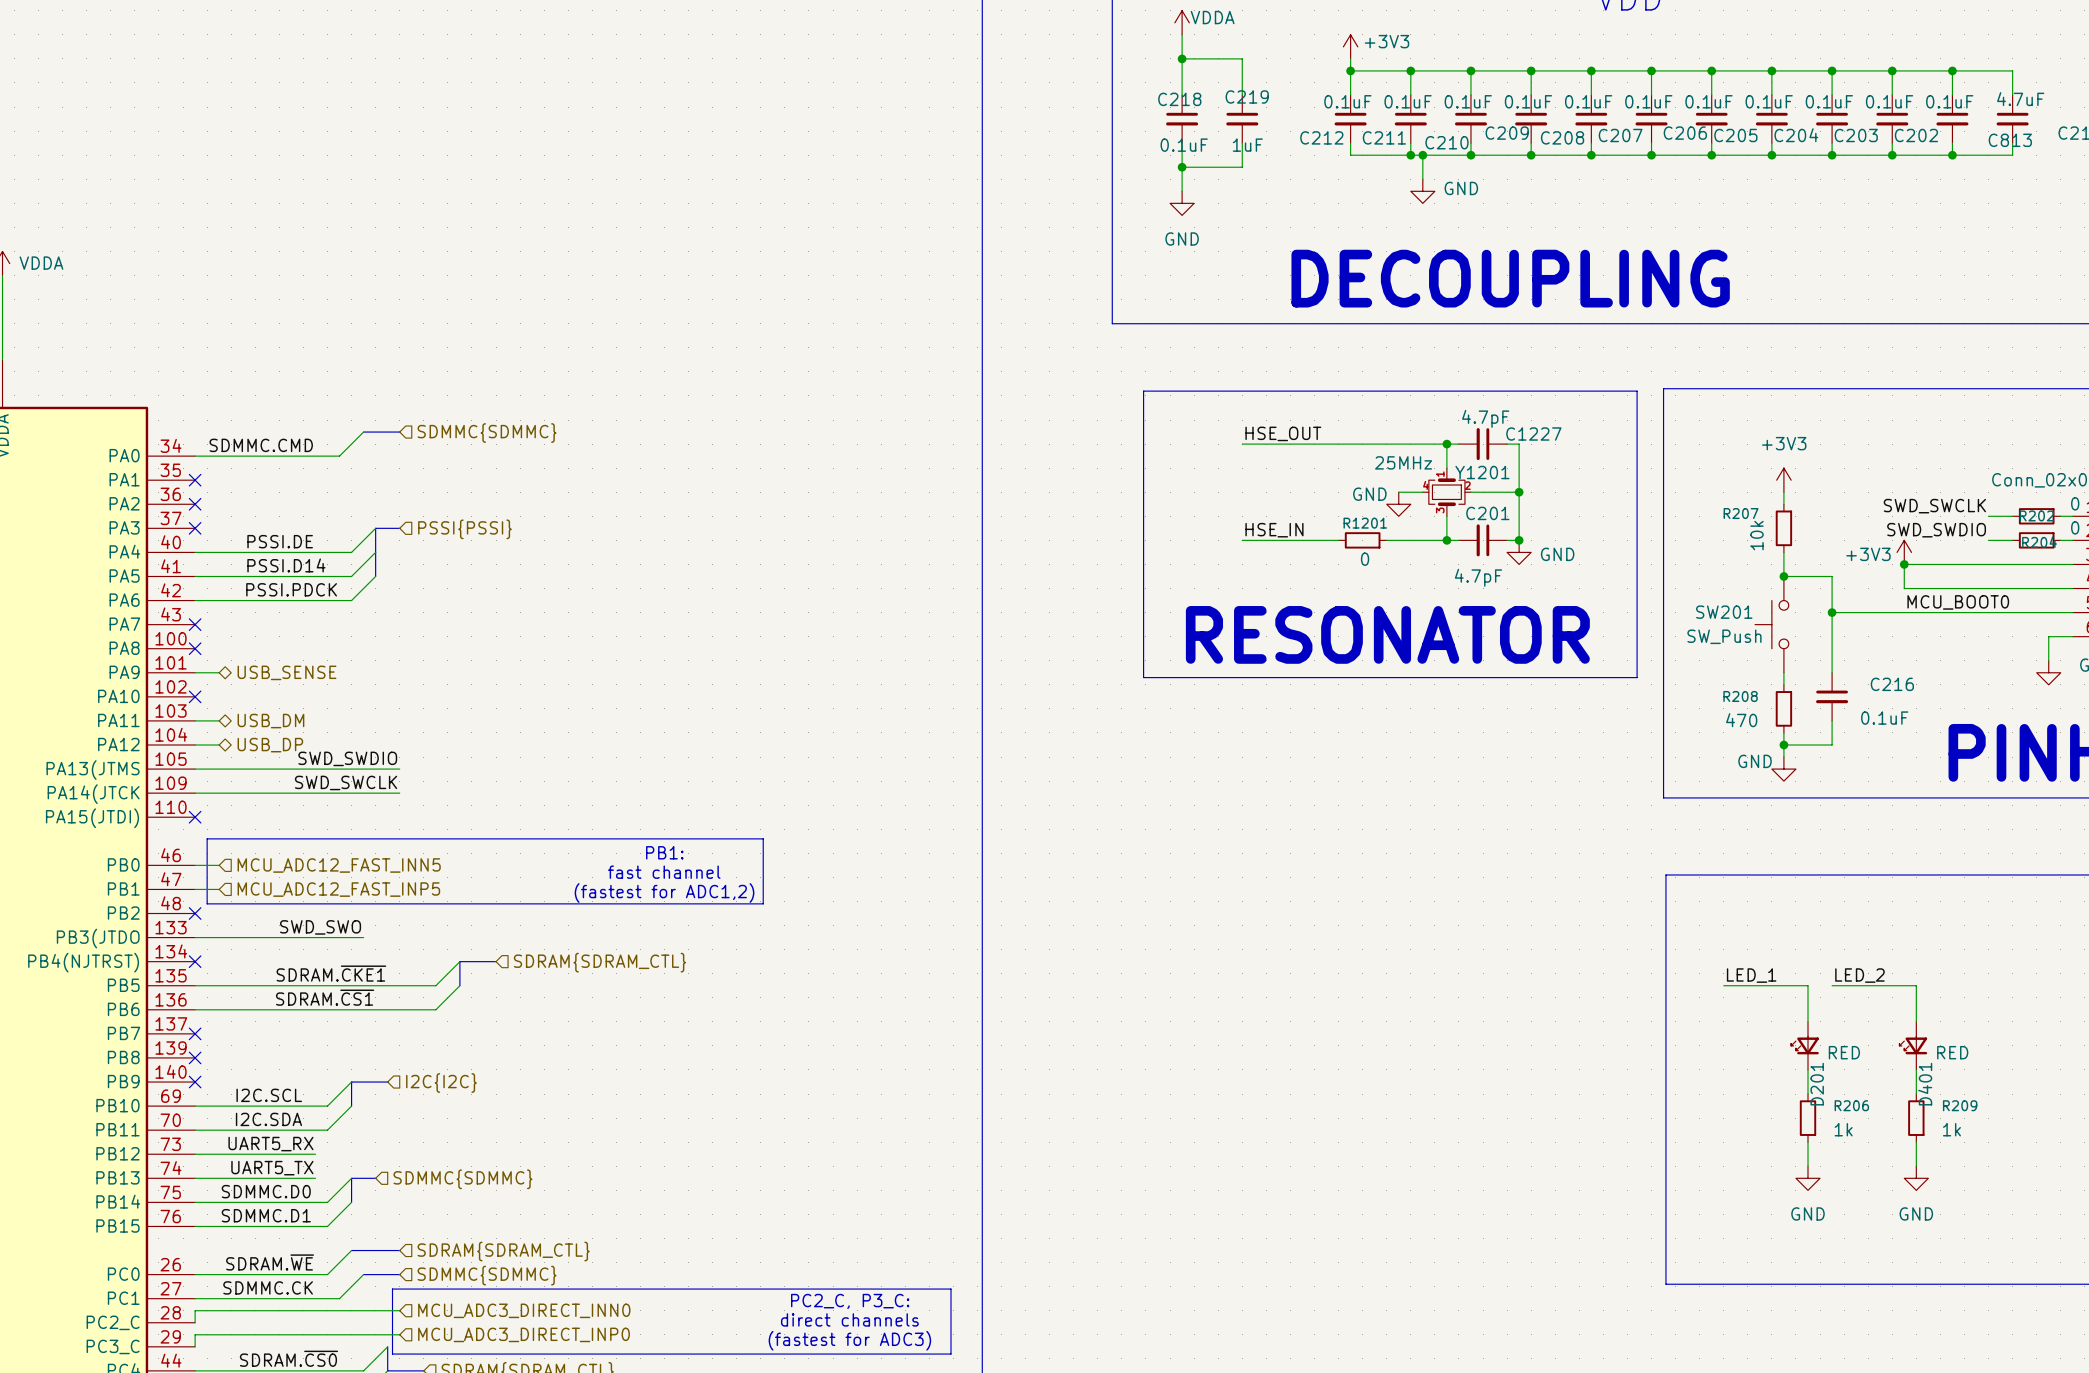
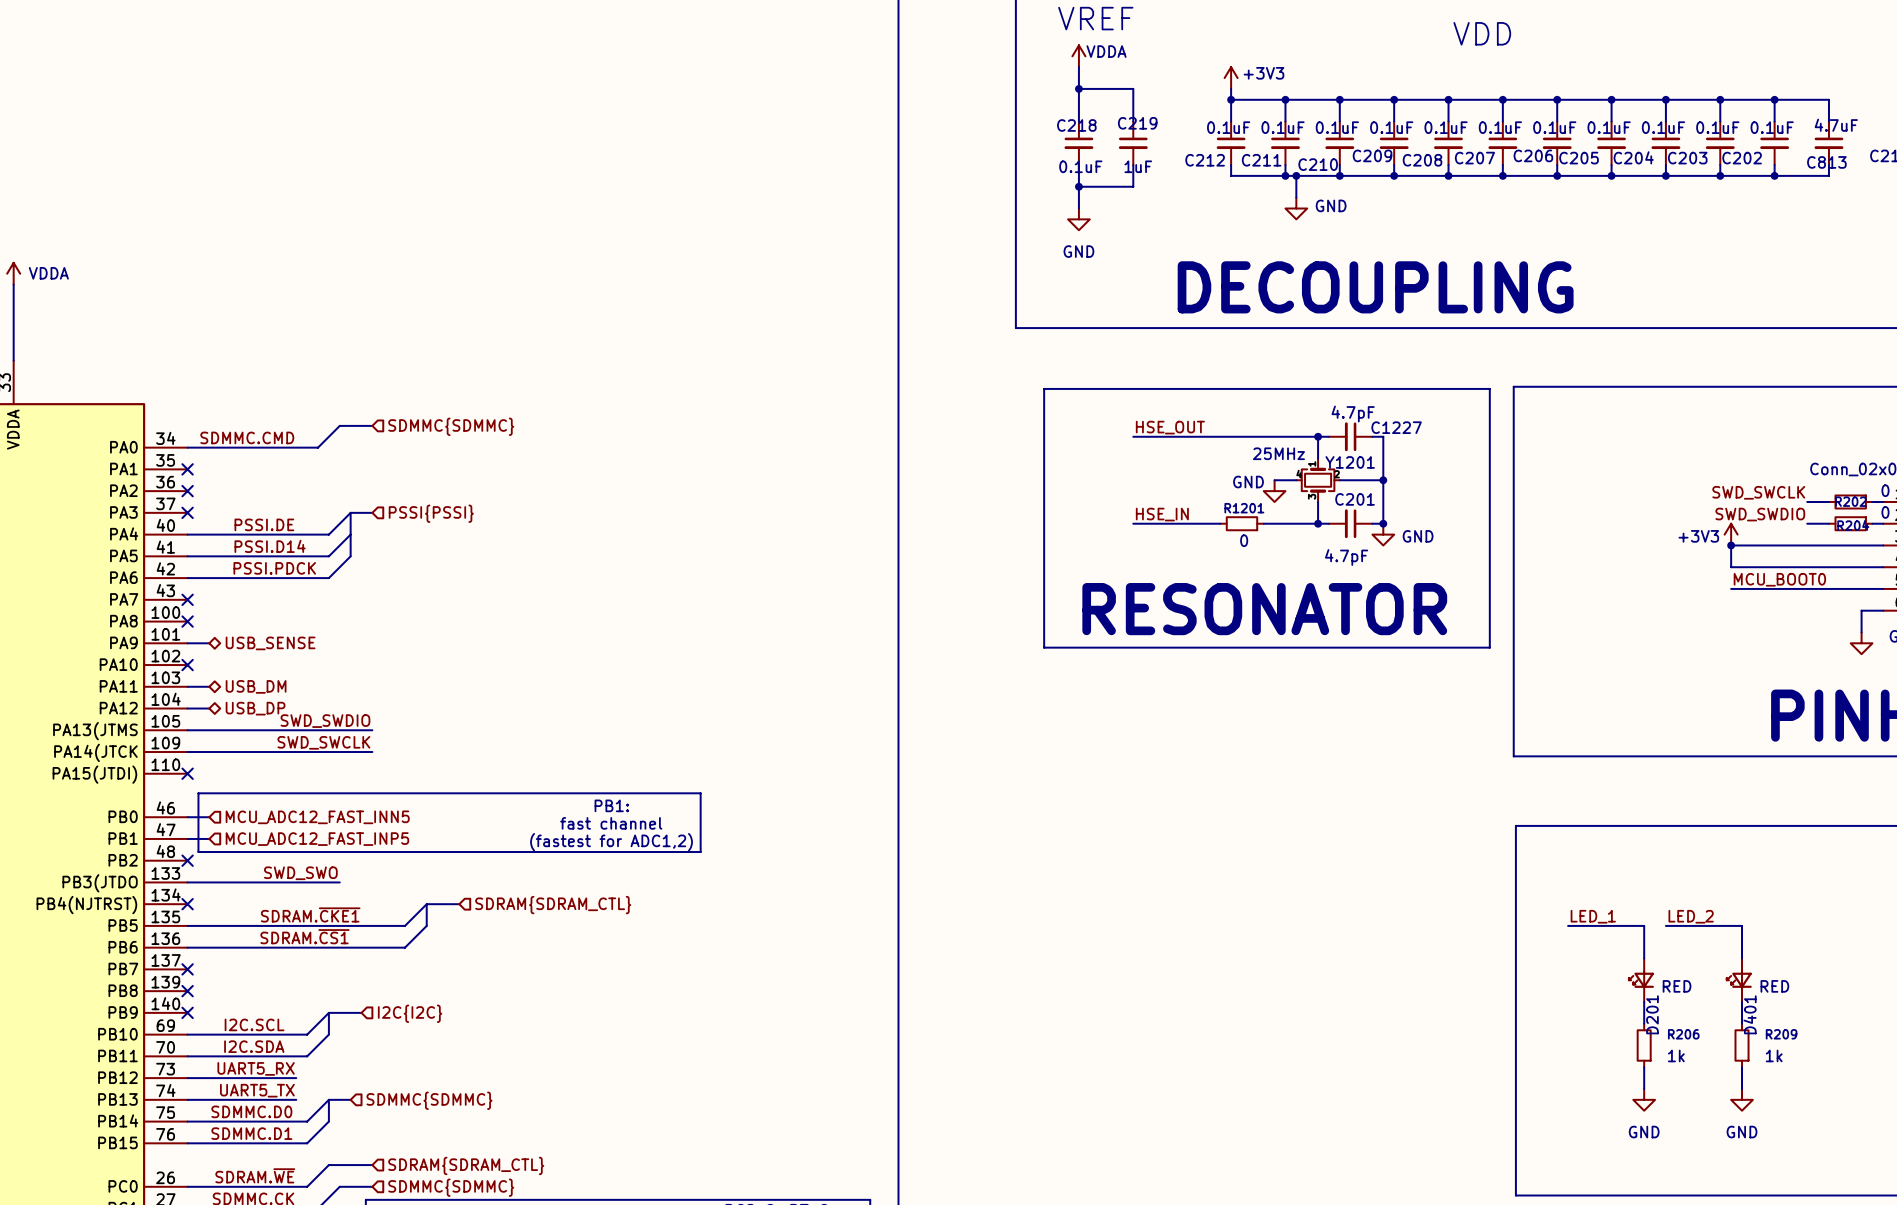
power symbol: +3V3 (1783, 480) -> none
wire: (1783, 492) (1783, 504) -> none
R207: 10k (1783, 528) -> none
wire: (1783, 552) (1783, 576) (1832, 576) (1832, 672) -> none
junction: (1783, 576) -> none
wire: (1832, 612) (1904, 612) -> none
junction: (1832, 612) -> none
SW201: SW_Push (1771, 624) -> none
wire: (1783, 672) (1783, 684) -> none
C216: 0.1uF (1832, 696) -> none
R208: 470 (1783, 708) -> none
wire: (1832, 720) (1832, 744) (1783, 744) -> none
wire: (1783, 732) (1783, 757) -> none
junction: (1783, 744) -> none
power symbol: GND (1783, 769) -> none

